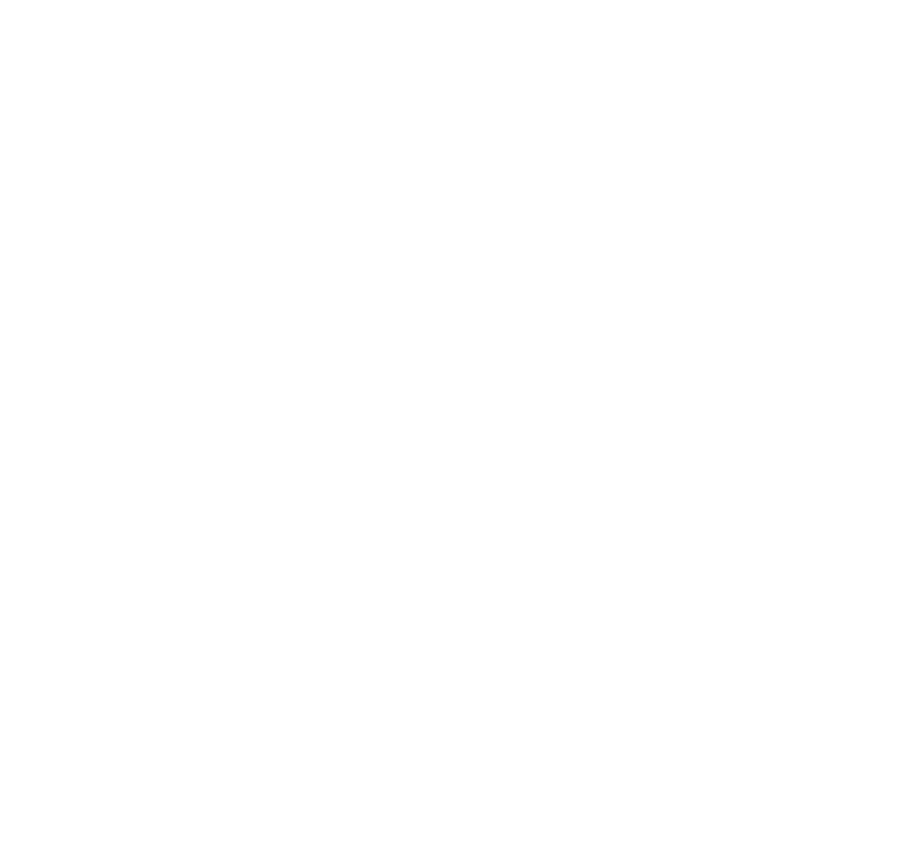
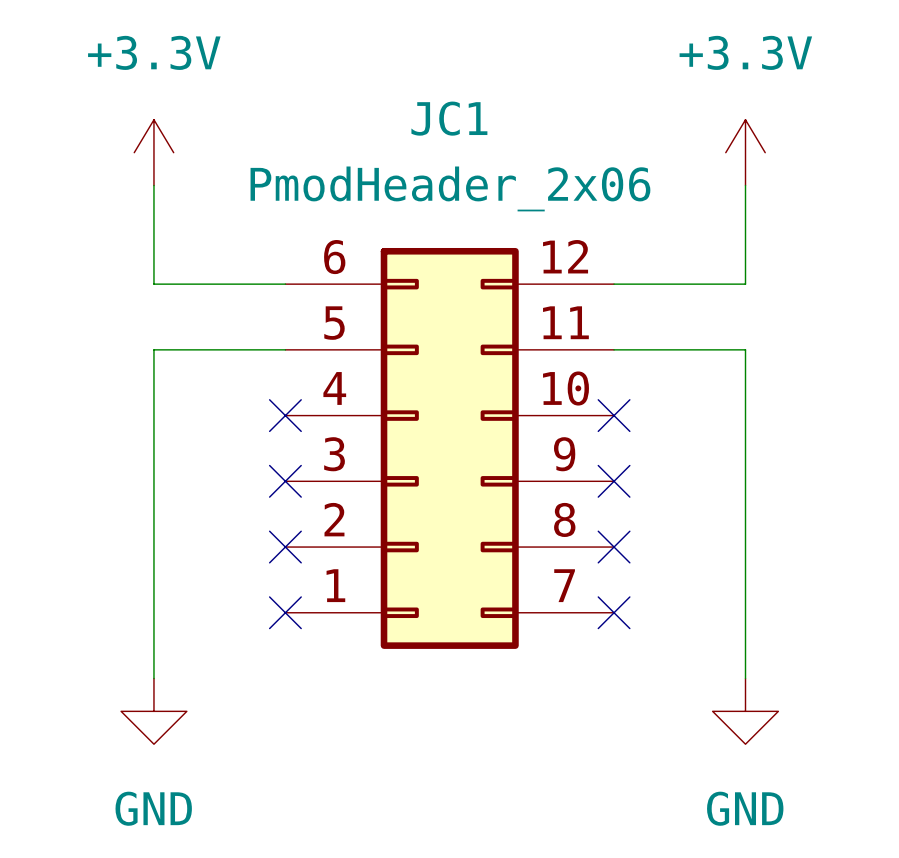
power symbol: none -> +3.3V (153, 152)
power symbol: none -> +3.3V (745, 152)
wire: none -> (153, 185) (153, 284) (285, 284)
wire: none -> (745, 185) (745, 284) (614, 284)
wire: none -> (285, 349) (153, 349) (153, 678)
wire: none -> (614, 349) (745, 349) (745, 678)
no-connect mark: none -> (285, 415)
no-connect mark: none -> (614, 415)
JC1: none -> PmodHeader_2x06 (449, 448)
no-connect mark: none -> (285, 481)
no-connect mark: none -> (614, 481)
no-connect mark: none -> (285, 547)
no-connect mark: none -> (614, 547)
no-connect mark: none -> (285, 612)
no-connect mark: none -> (614, 612)
power symbol: none -> GND (153, 711)
power symbol: none -> GND (745, 711)

